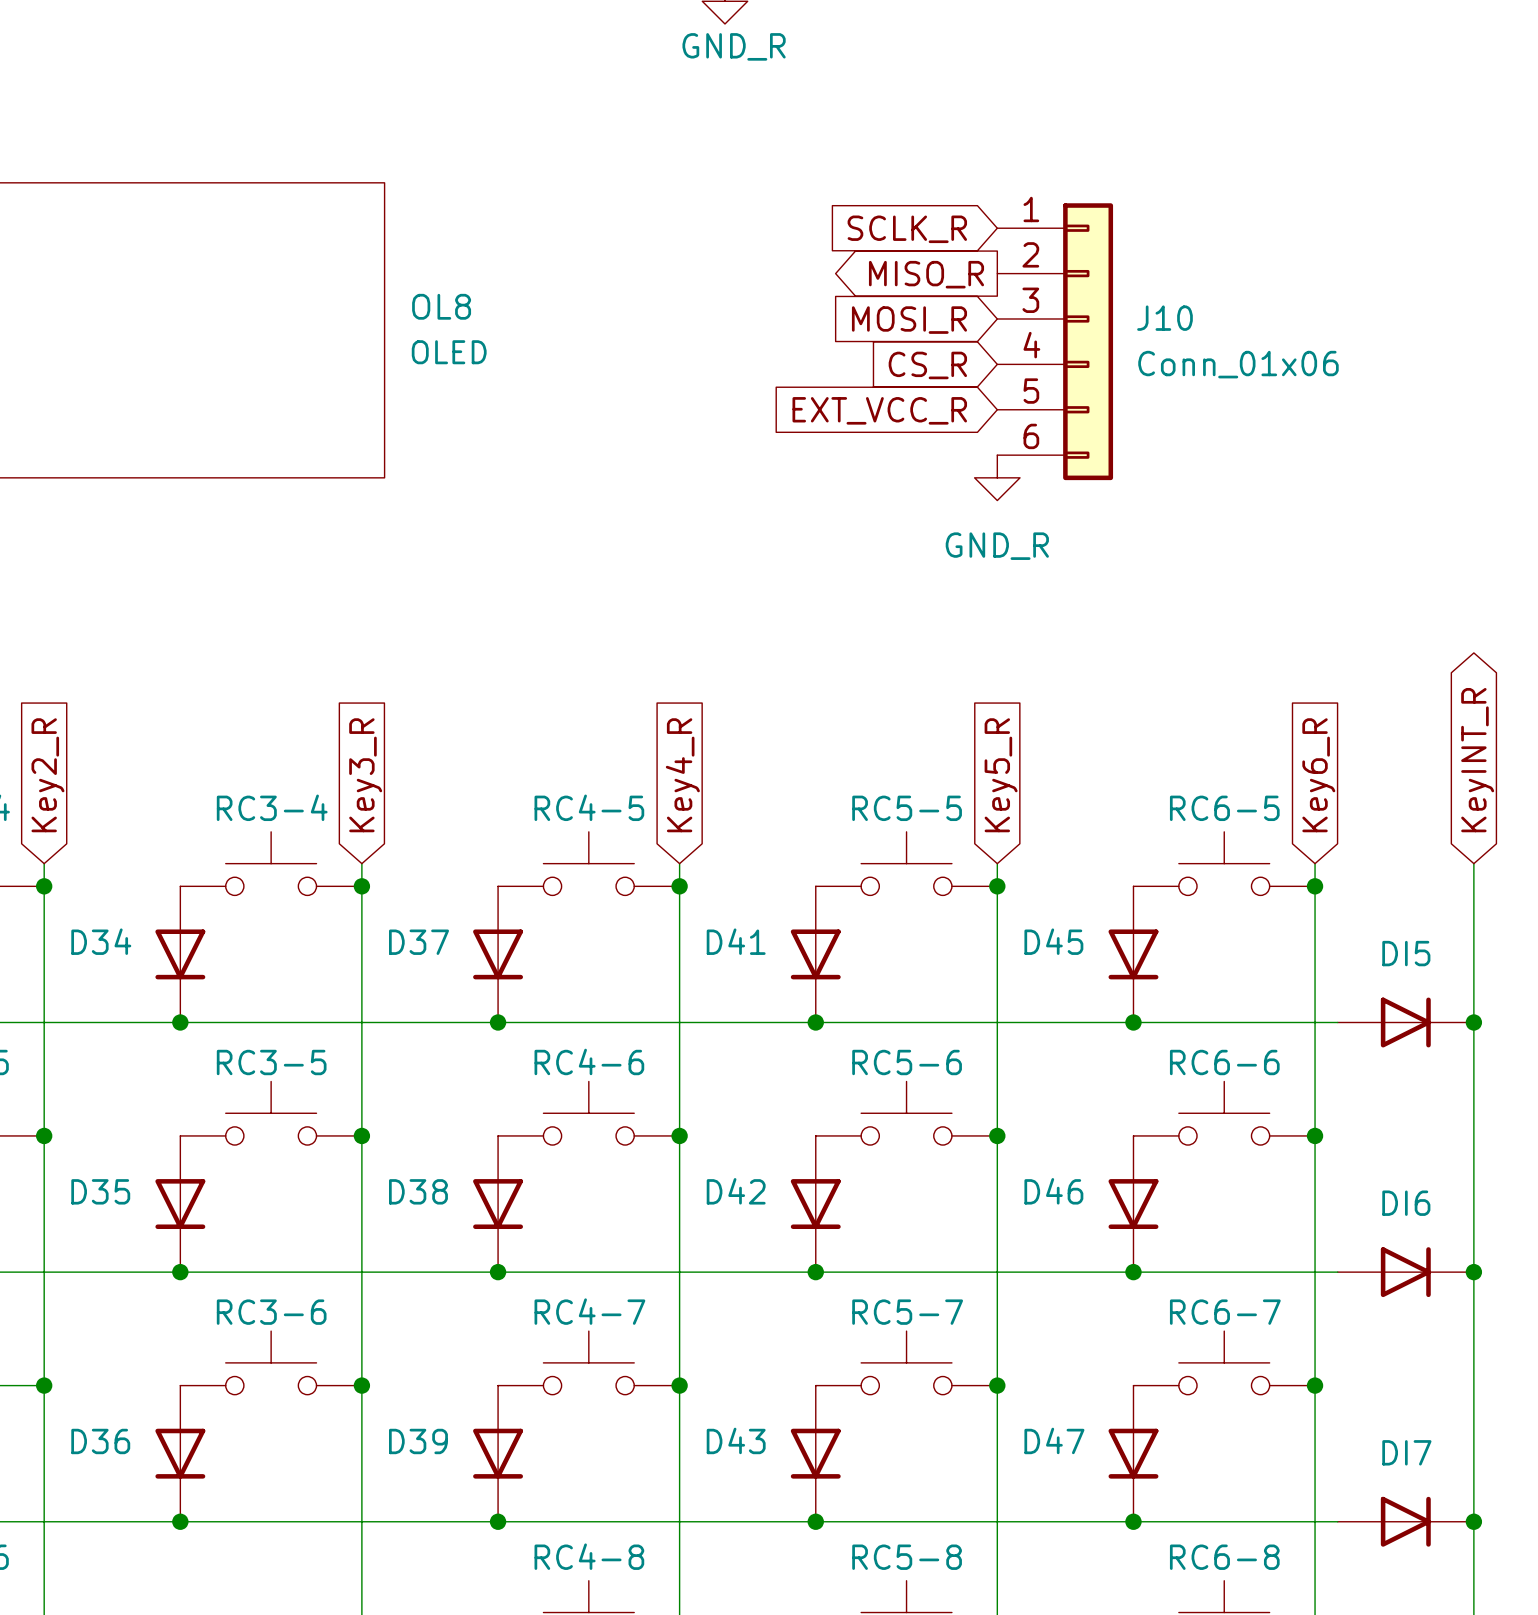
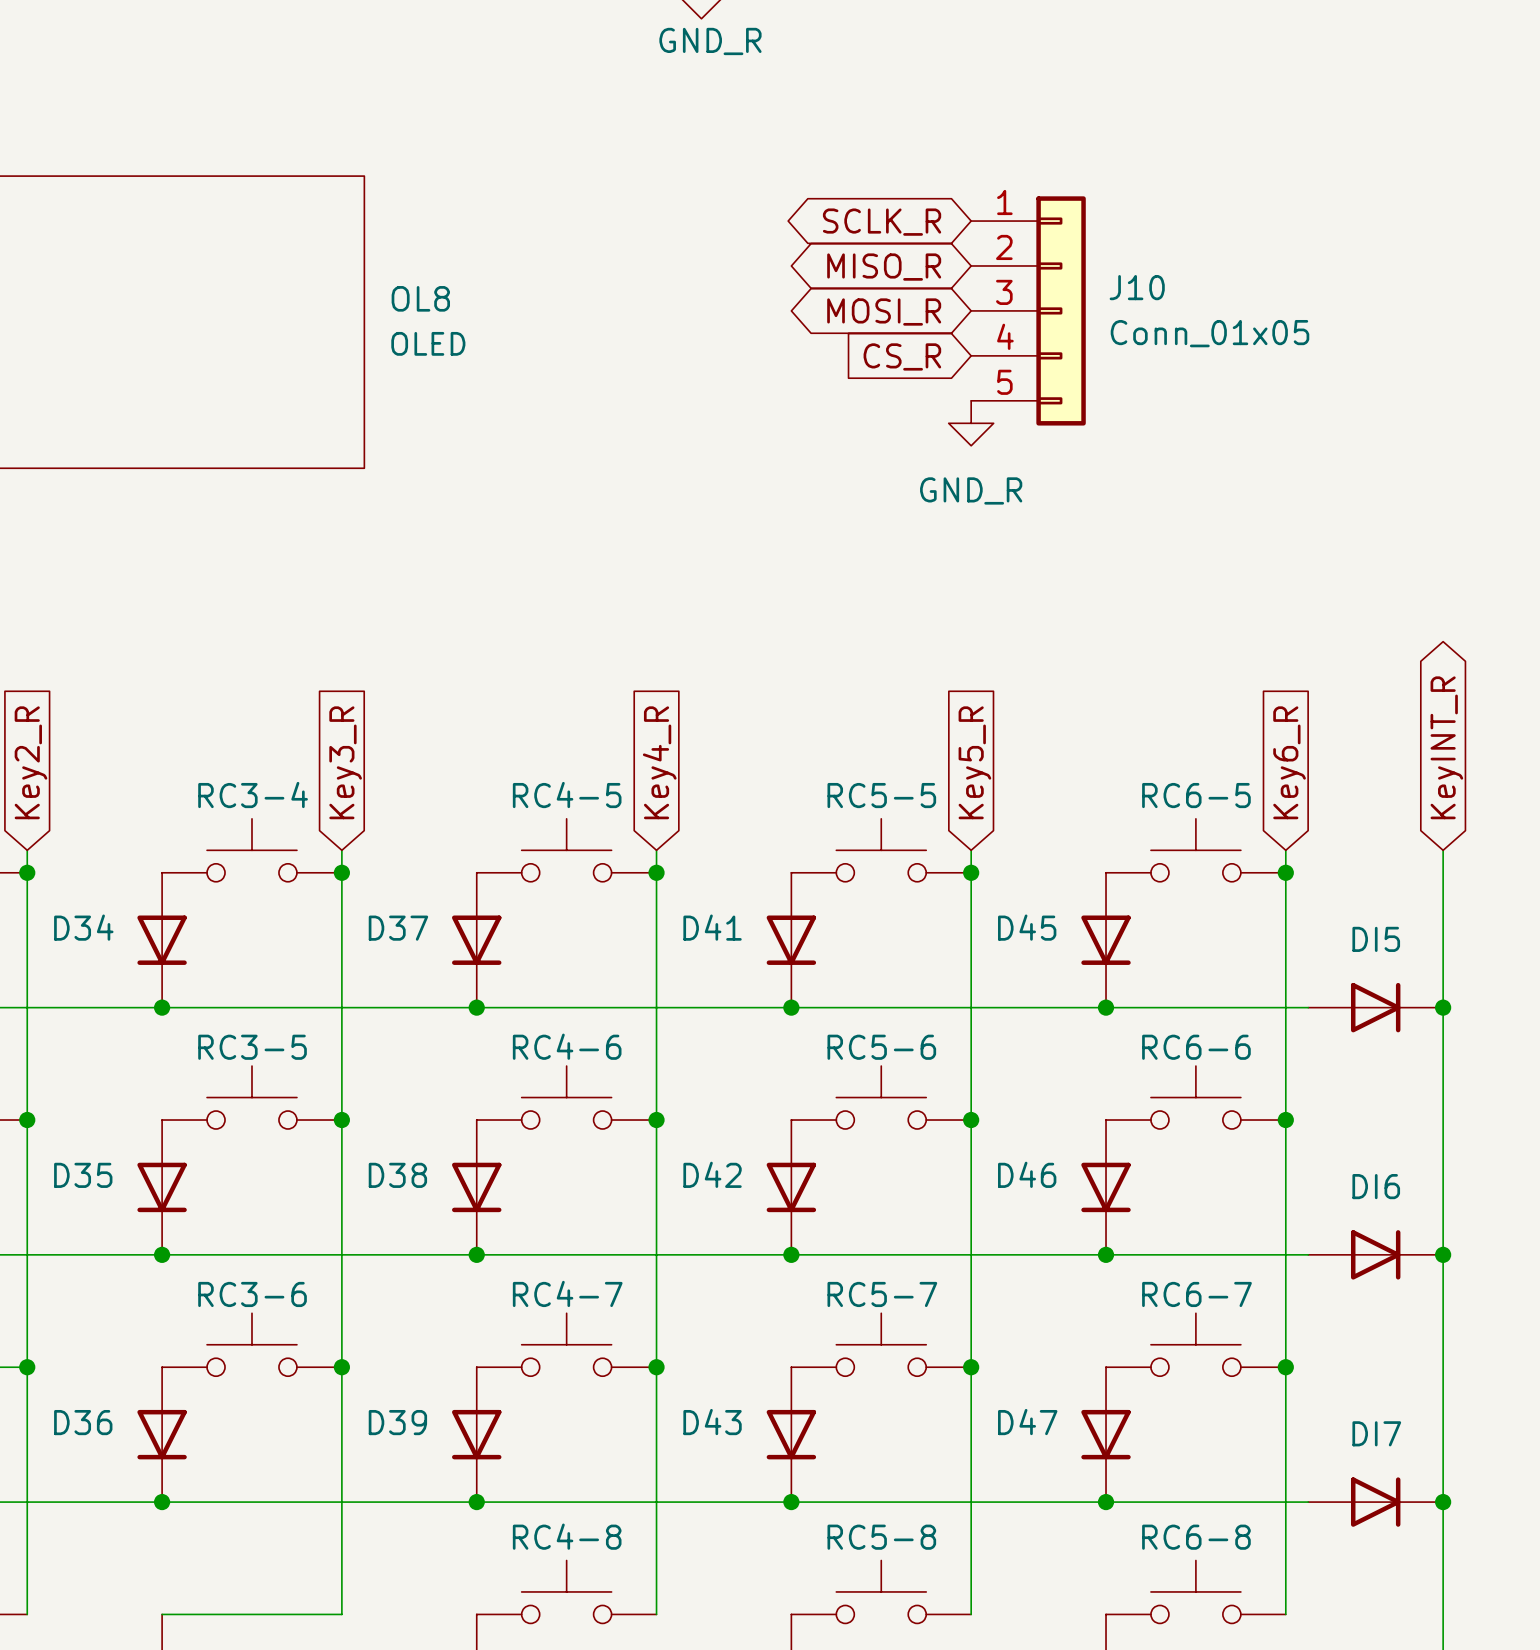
J10 symbol: [997, 203, 1114, 481] -> [971, 196, 1086, 426]
global label shape: input (907, 229) -> bidirectional (882, 222)
global label shape: output (926, 274) -> bidirectional (884, 267)
global label shape: input (909, 320) -> bidirectional (884, 312)
J10 value: Conn_01x06 (1238, 364) -> Conn_01x05 (1209, 333)
global label: EXT_VCC_R (879, 410) -> none
power symbol position: GND_R (997, 477) -> GND_R (971, 423)

